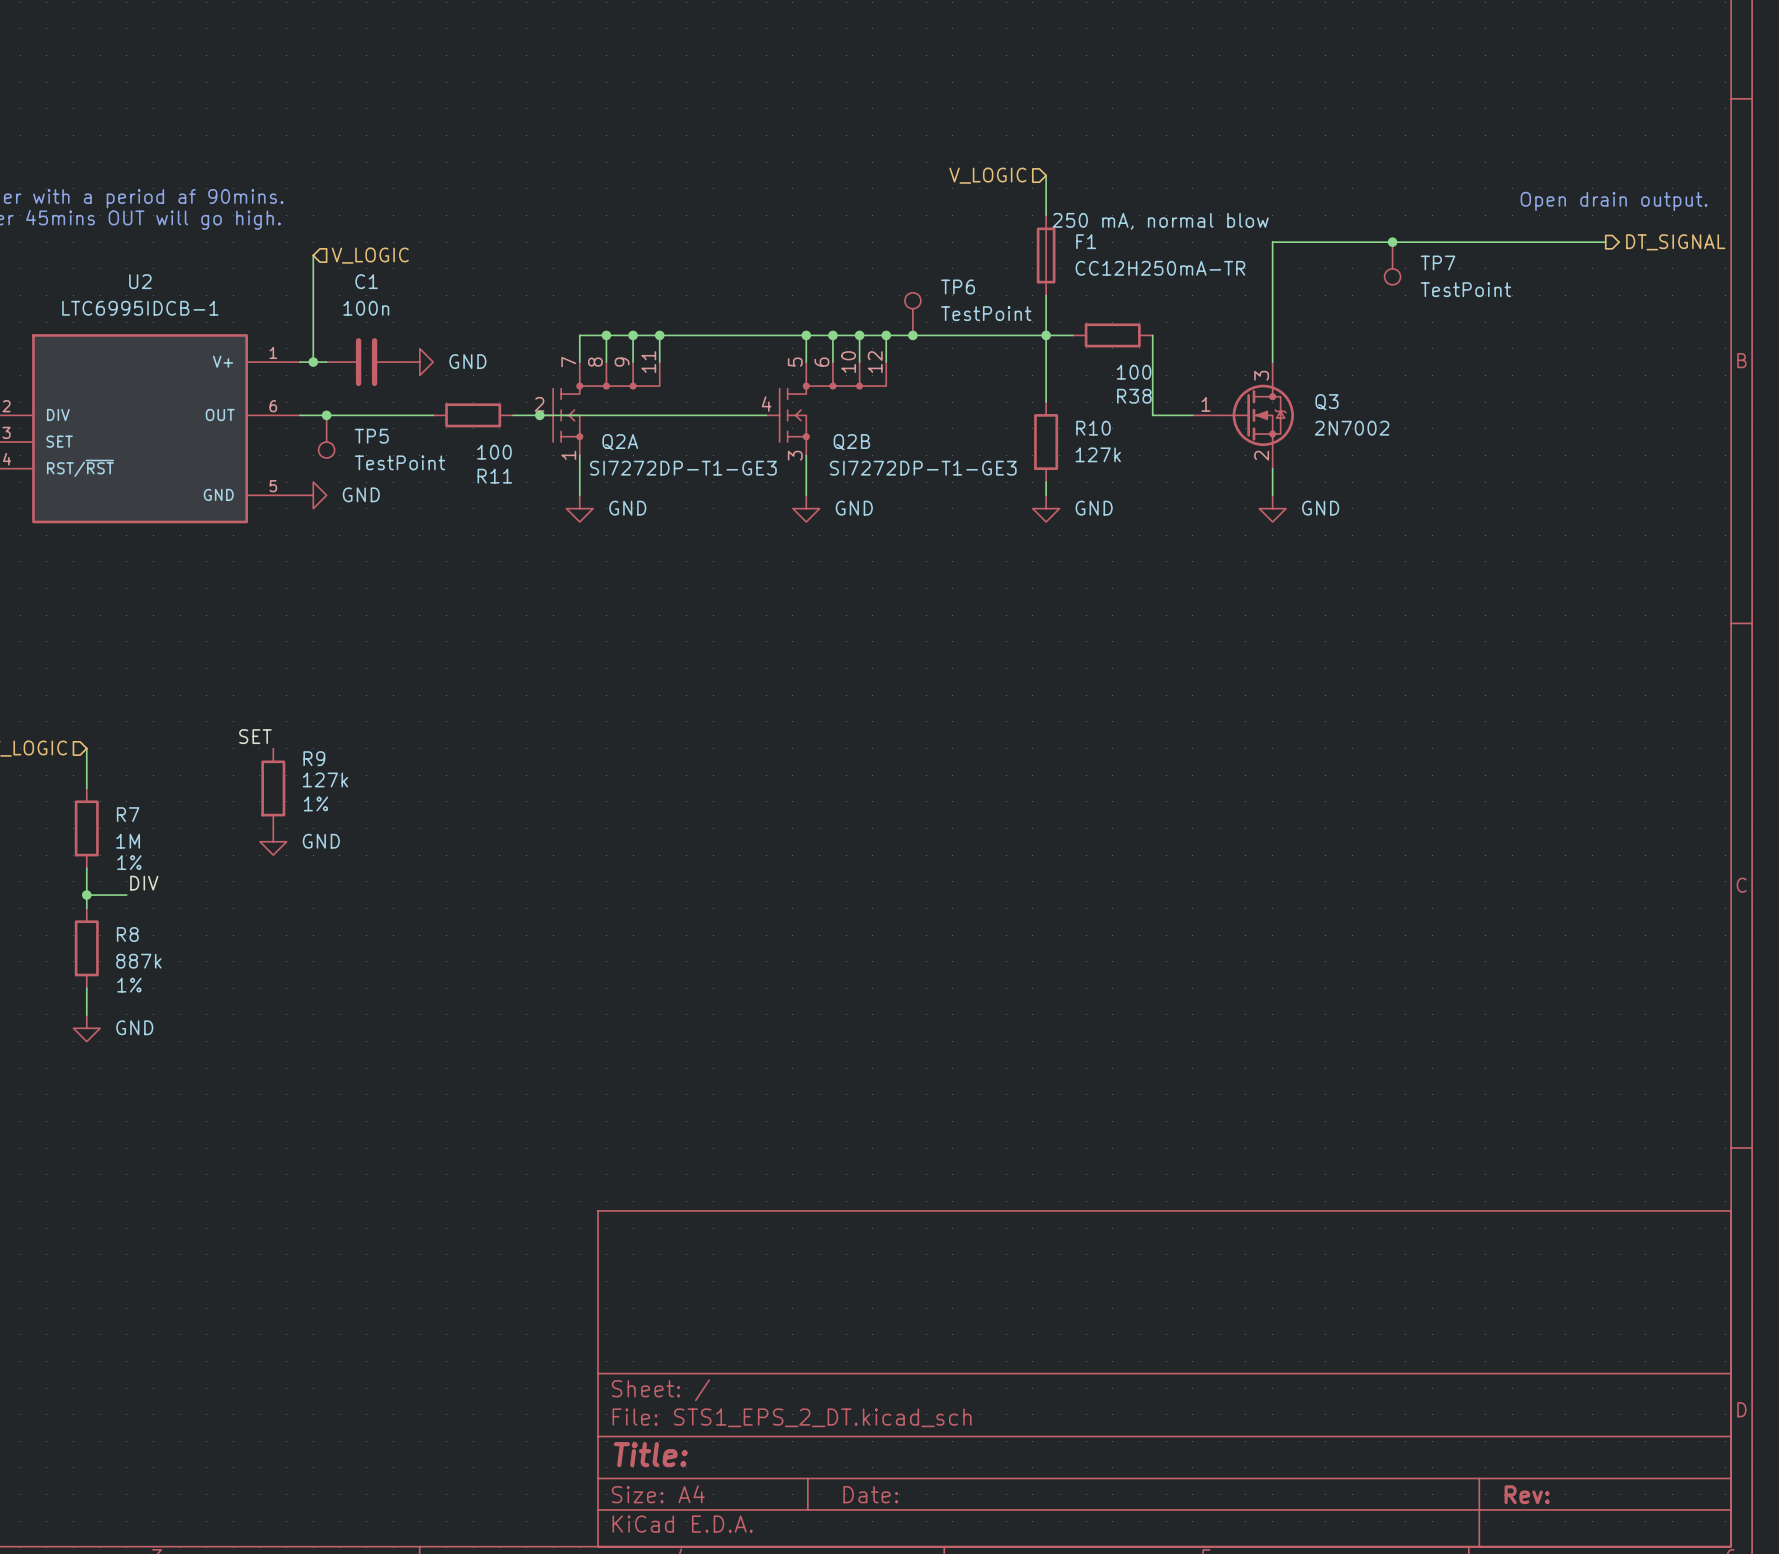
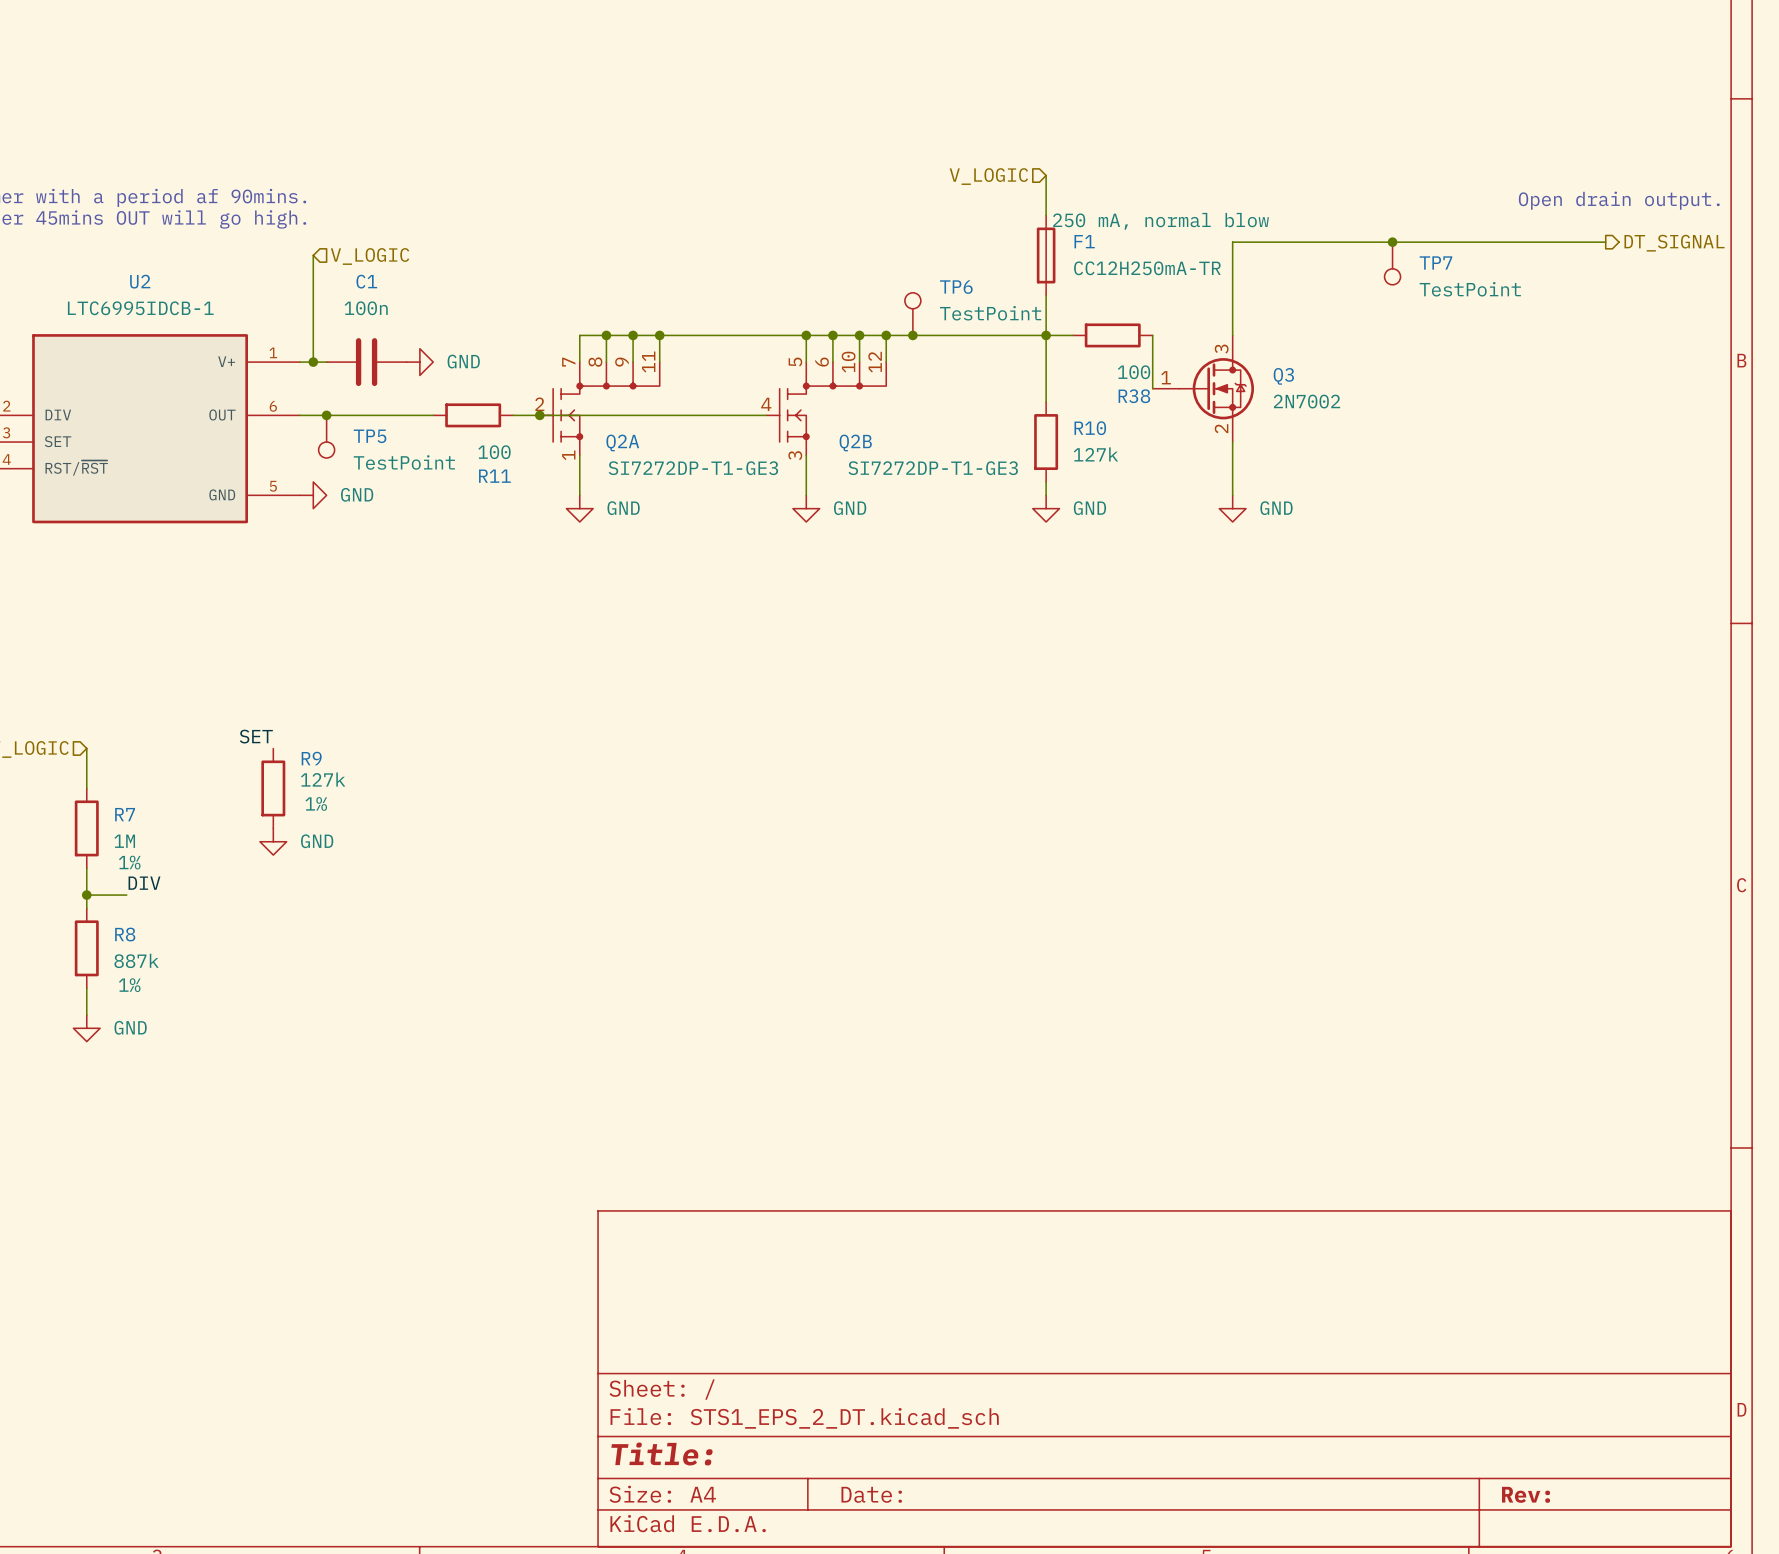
wire: (1272, 242) (1272, 362) -> (1272, 242) (1232, 242) (1232, 335)
wire: (1152, 388) (1152, 415) (1192, 415) -> none
Q3 position: (1243, 415) -> (1203, 388)
wire: none -> (1232, 442) (1232, 495)
wire: (1272, 468) (1272, 495) -> none
power symbol position: GND (1272, 508) -> GND (1232, 508)

